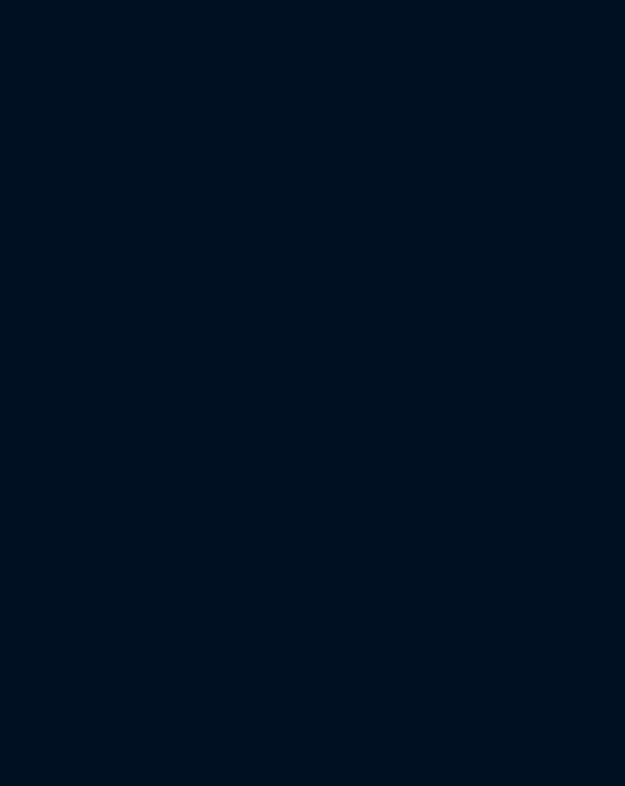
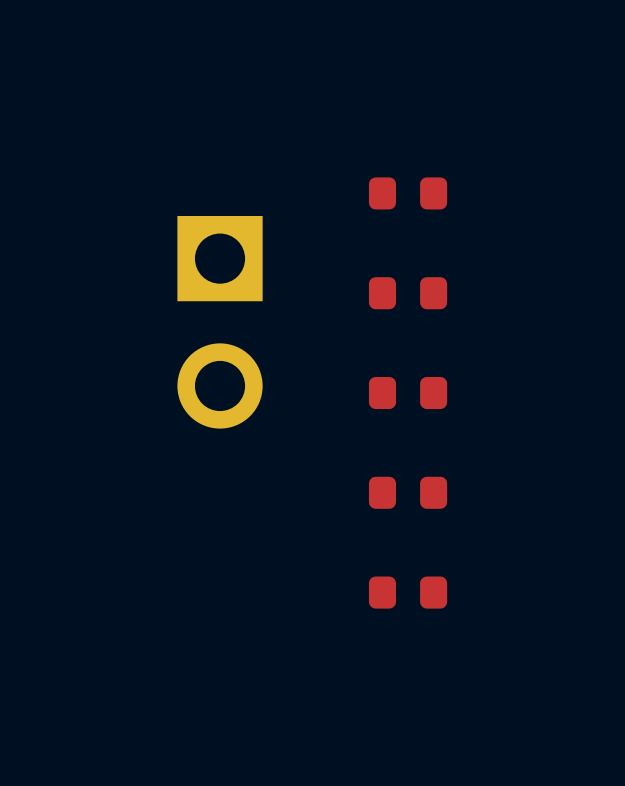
part: none -> (408, 193)
part: none -> (408, 293)
part: none -> (220, 322)
part: none -> (408, 393)
part: none -> (408, 492)
part: none -> (408, 592)

